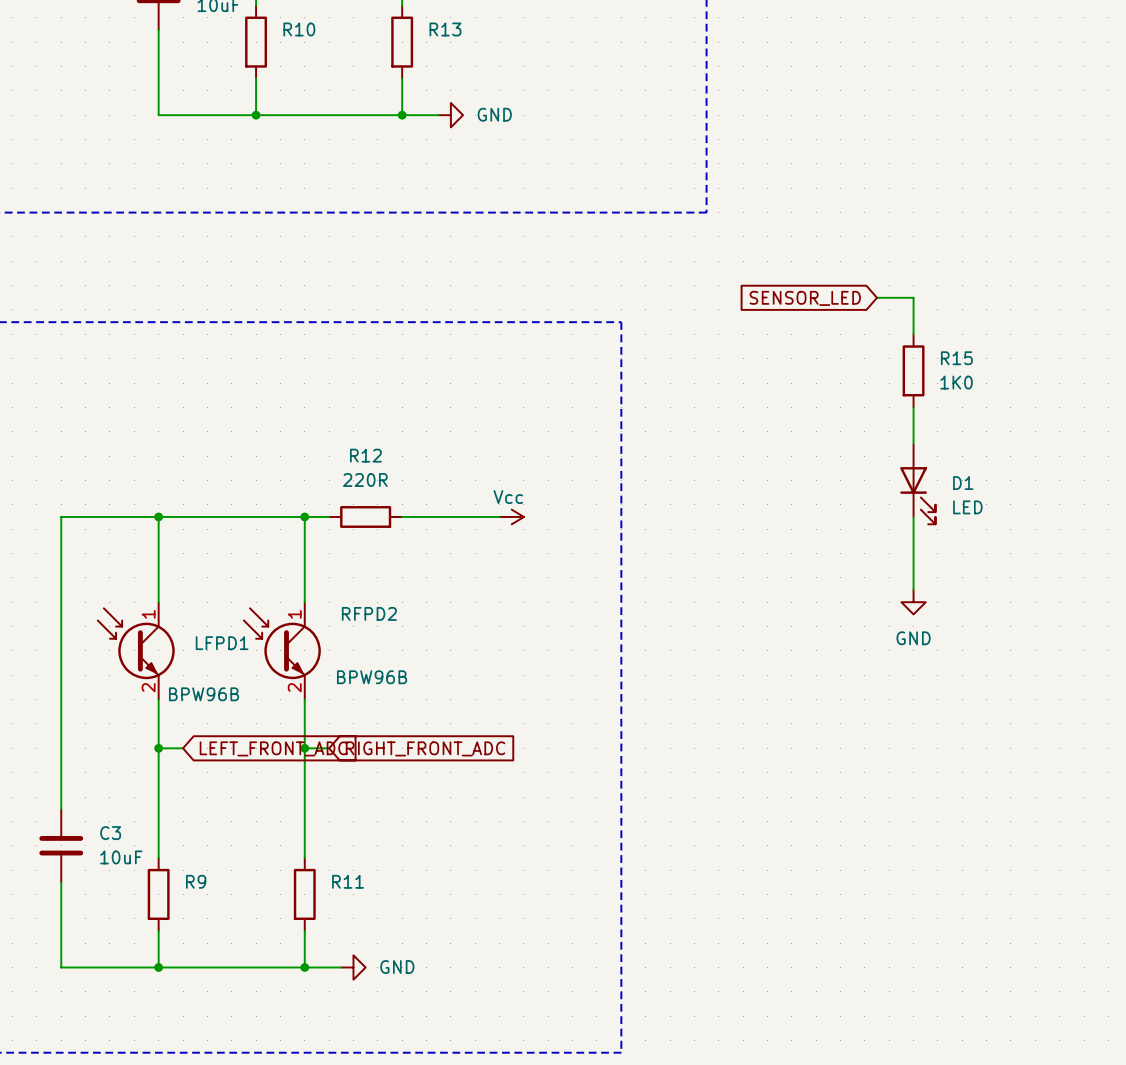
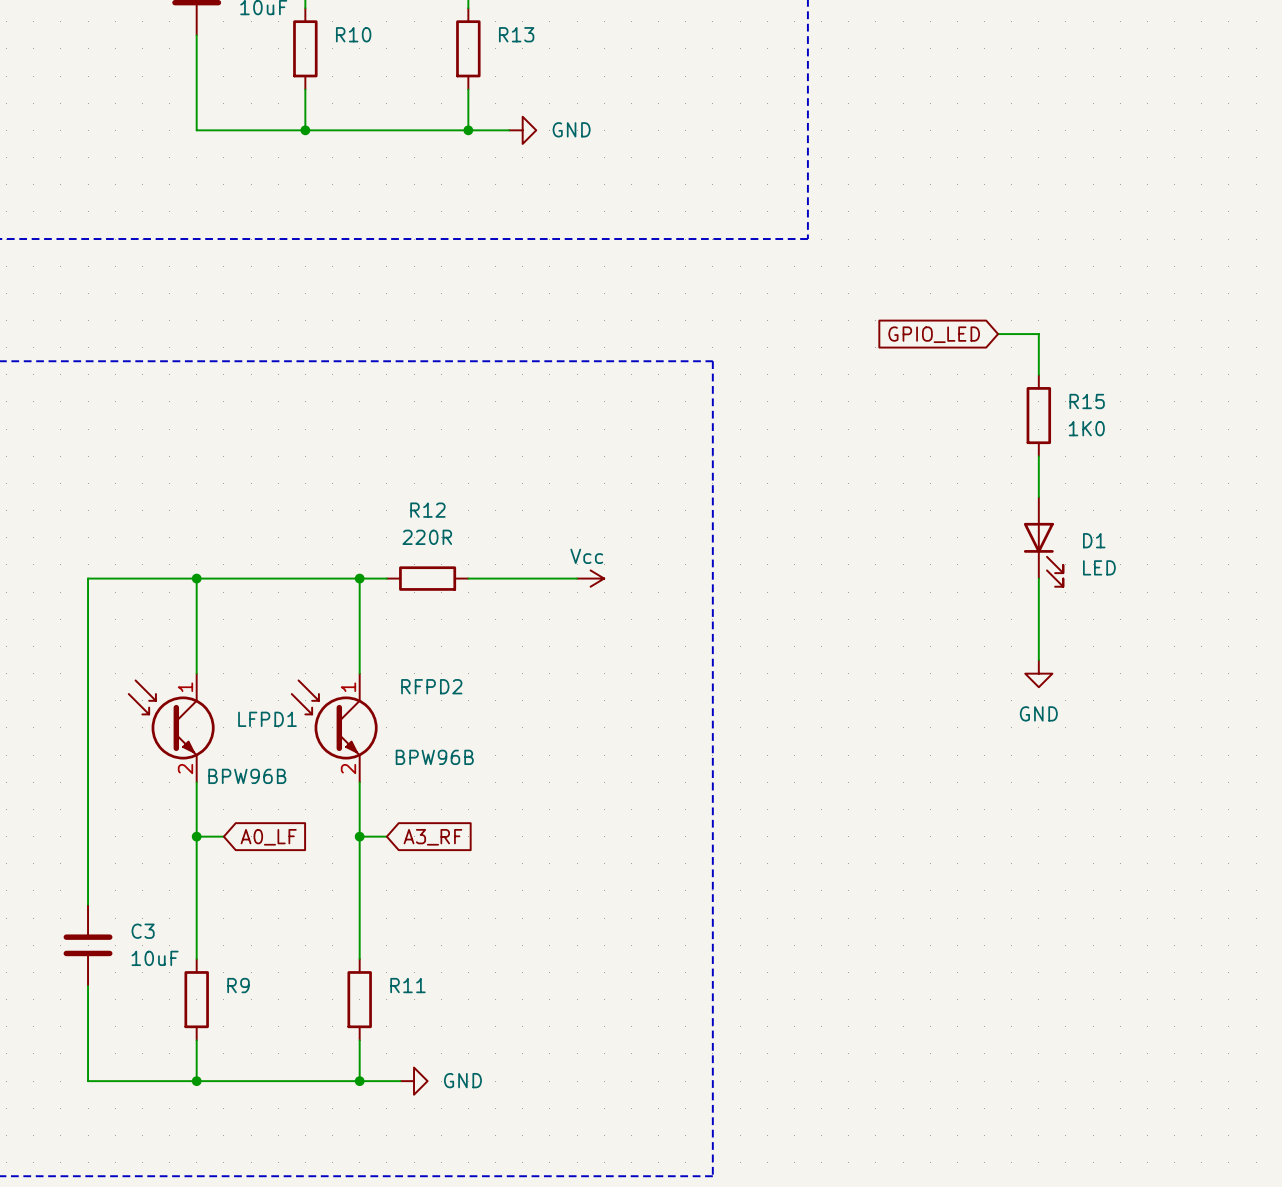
global label: SENSOR_LED (805, 298) -> GPIO_LED (934, 334)
global label: LEFT_FRONT_ADC (273, 748) -> A0_LF (268, 837)
global label: RIGHT_FRONT_ADC (425, 748) -> A3_RF (432, 837)

